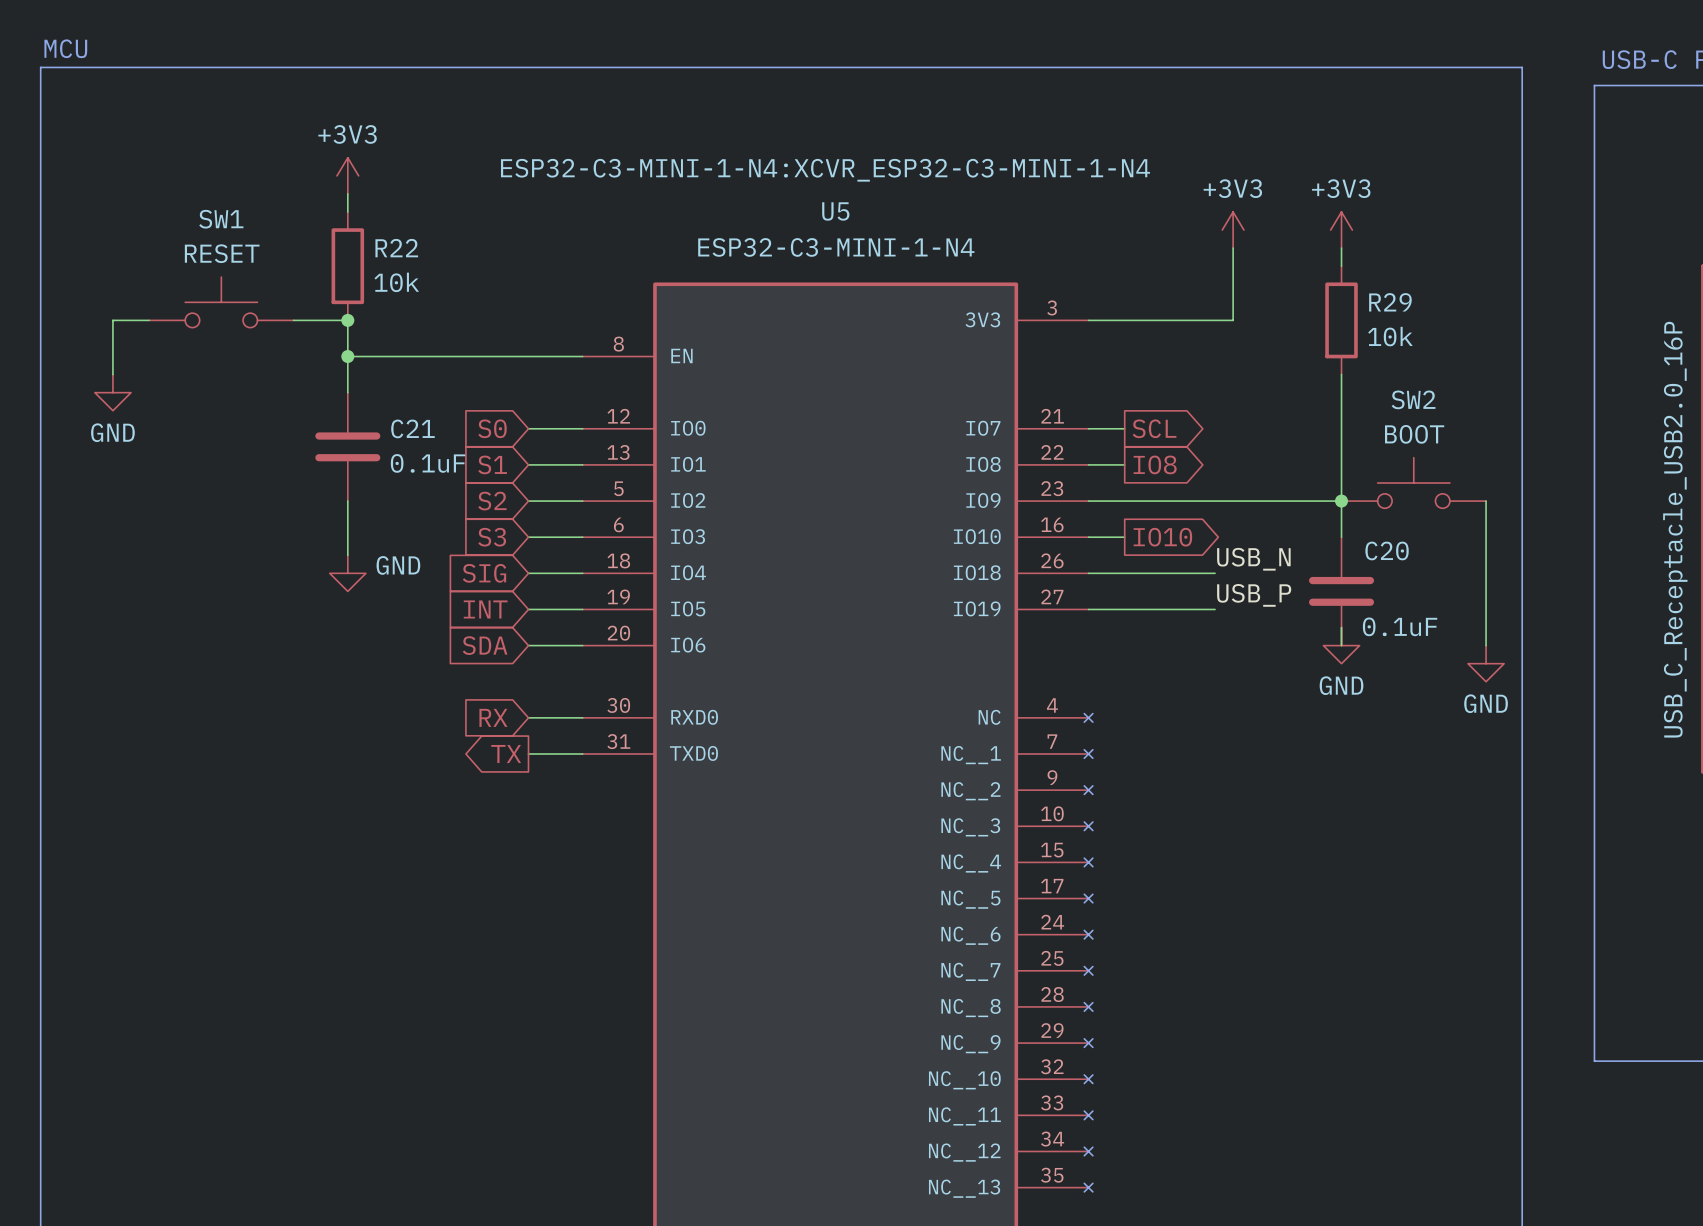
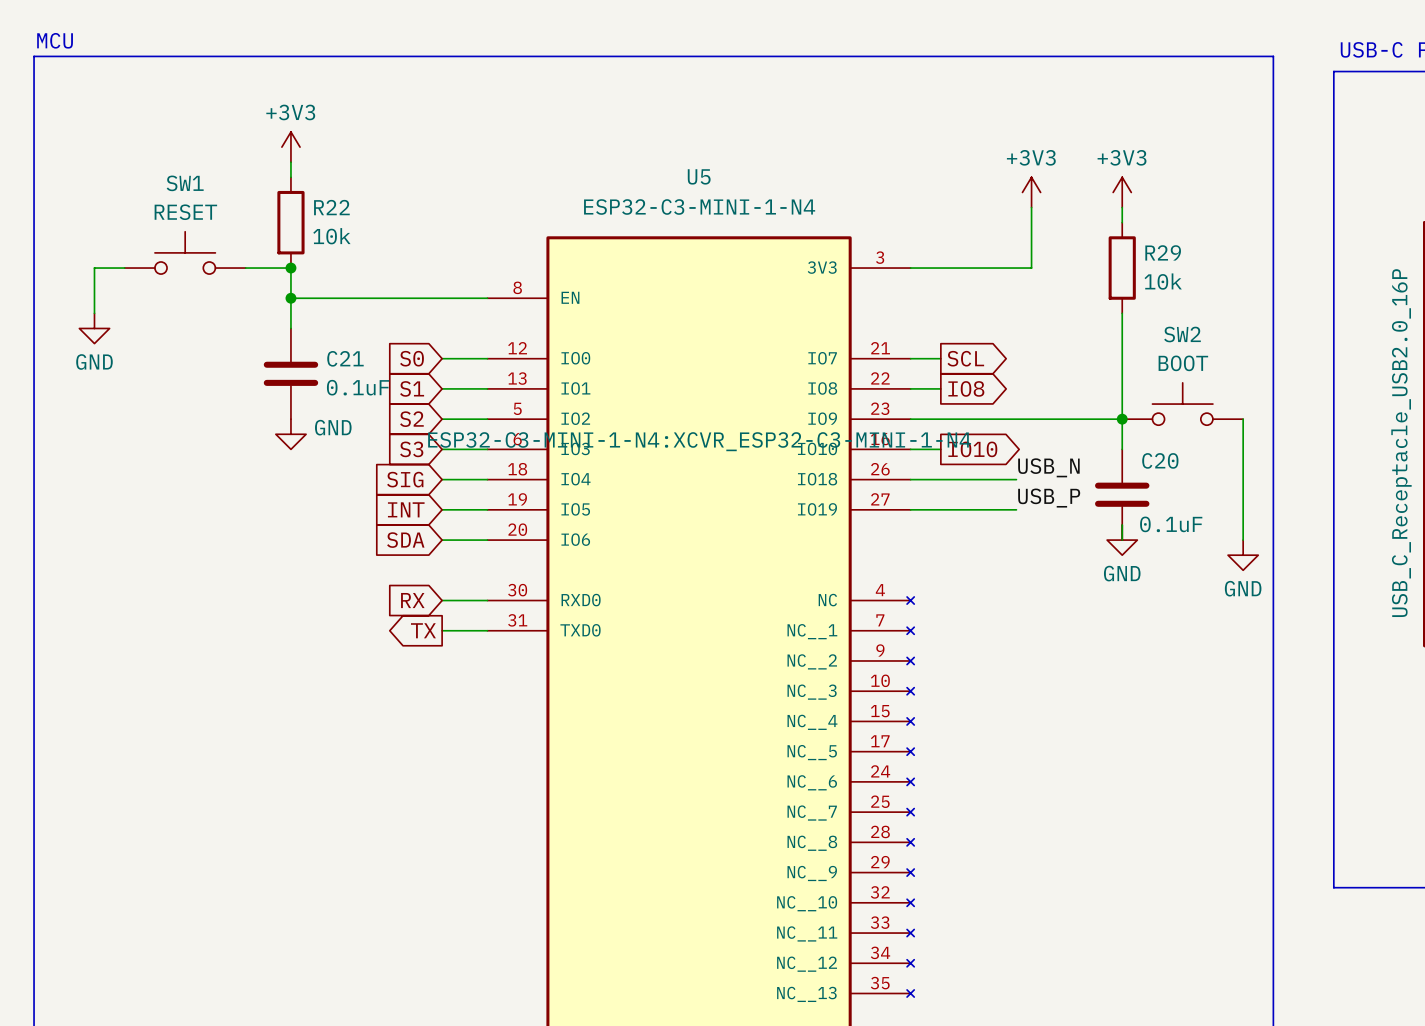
U5 text position: ESP32-C3-MINI-1-N4:XCVR_ESP32-C3-MINI-1-N4 (825, 170) -> ESP32-C3-MINI-1-N4:XCVR_ESP32-C3-MINI-1-N4 (699, 441)
wire: (347, 501) (347, 555) -> none
power symbol position: GND (347, 573) -> GND (290, 434)

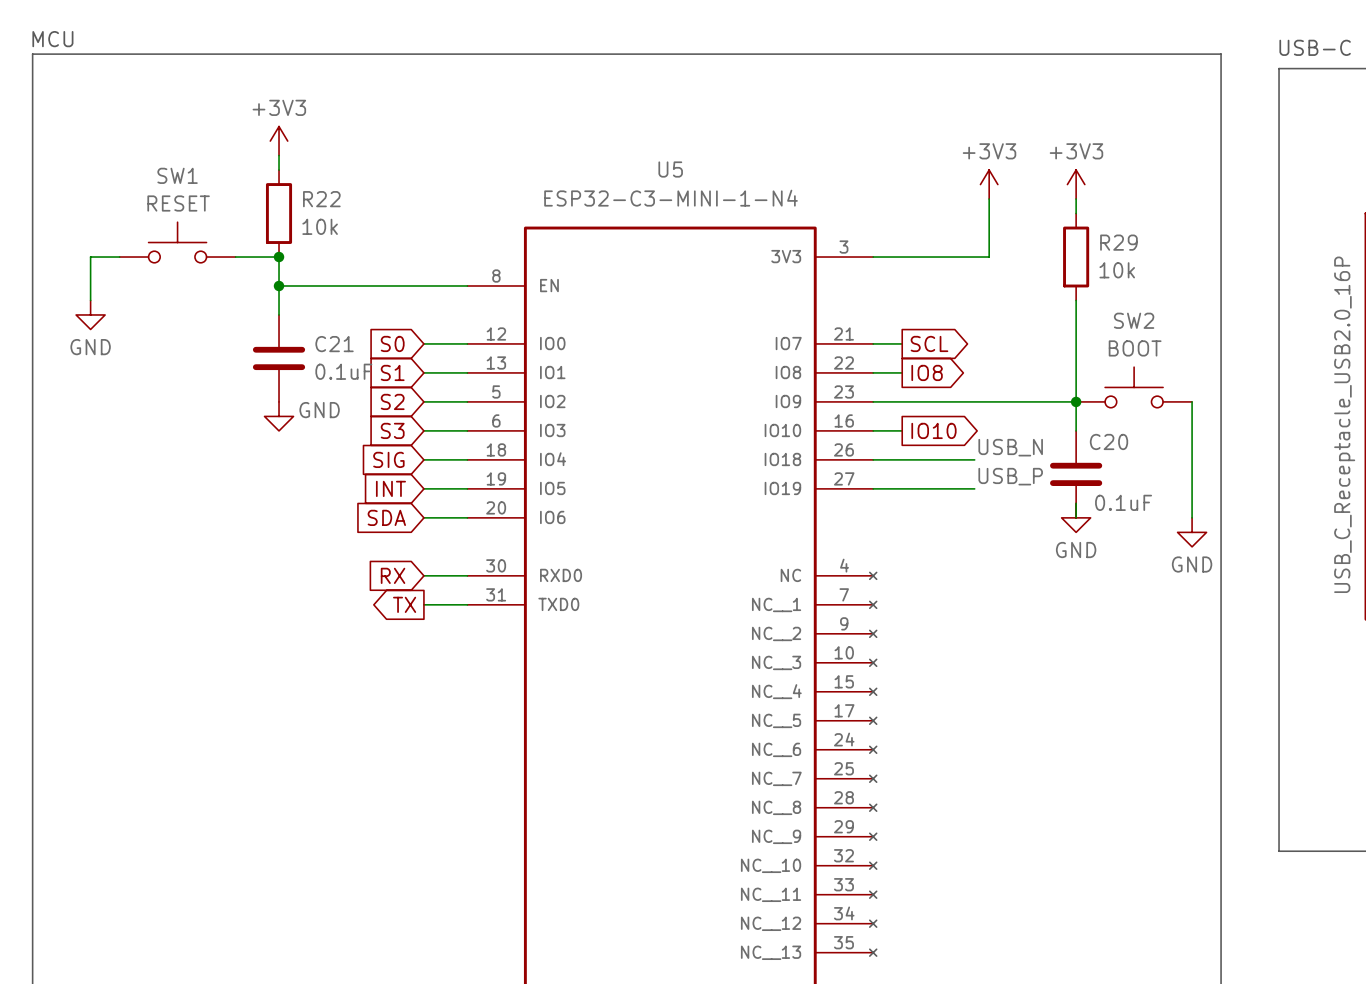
U5 text: ESP32-C3-MINI-1-N4:XCVR_ESP32-C3-MINI-1-N4 (699, 441) -> none

